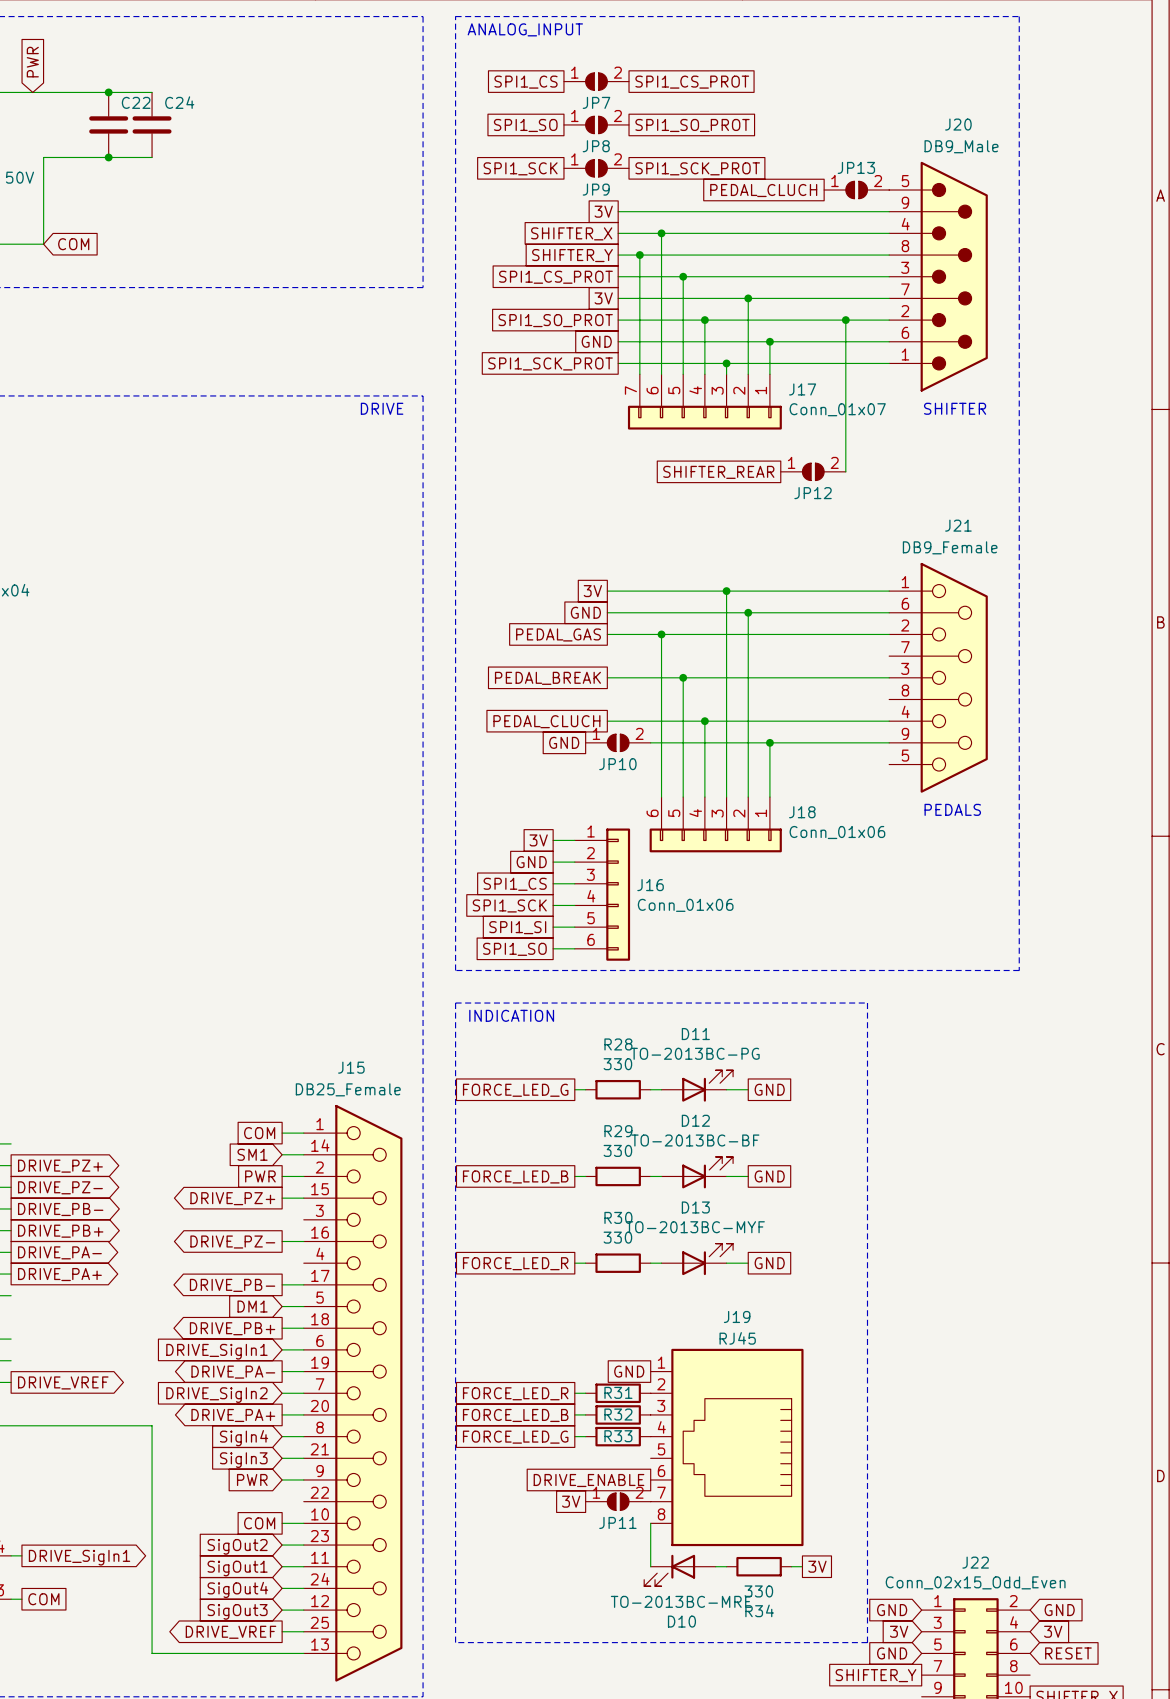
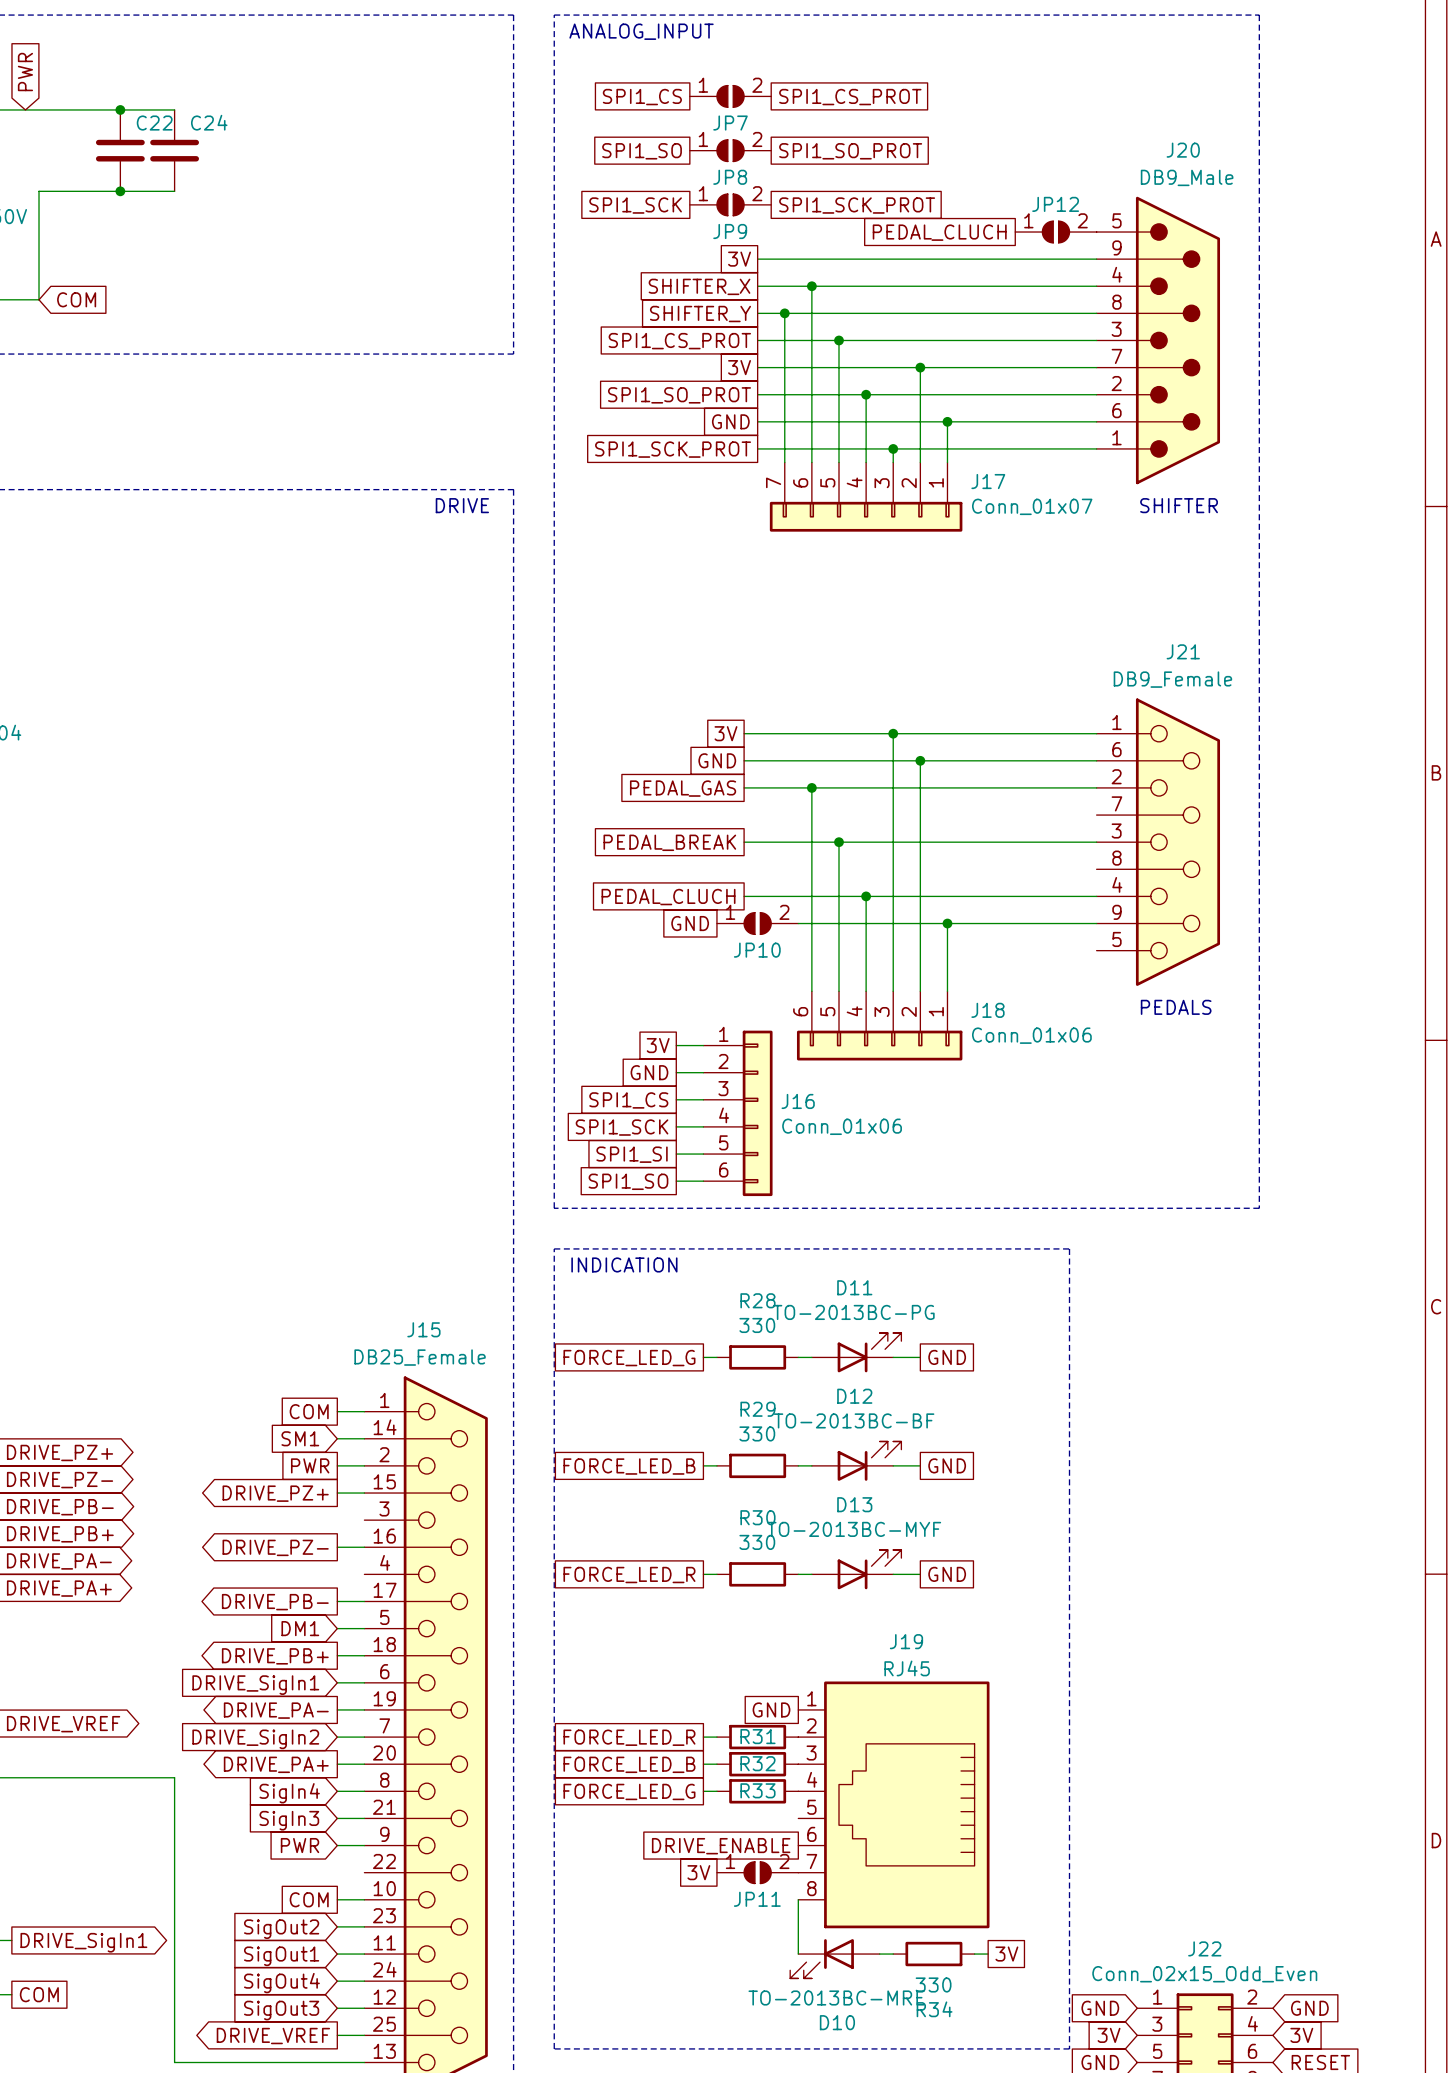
JP13 name: JP13 (856, 167) -> JP12 (1055, 204)
wire: (845, 320) (845, 471) -> none
junction: (845, 320) -> none
JP12: (813, 471) -> none
global label: SHIFTER_REAR (718, 472) -> none

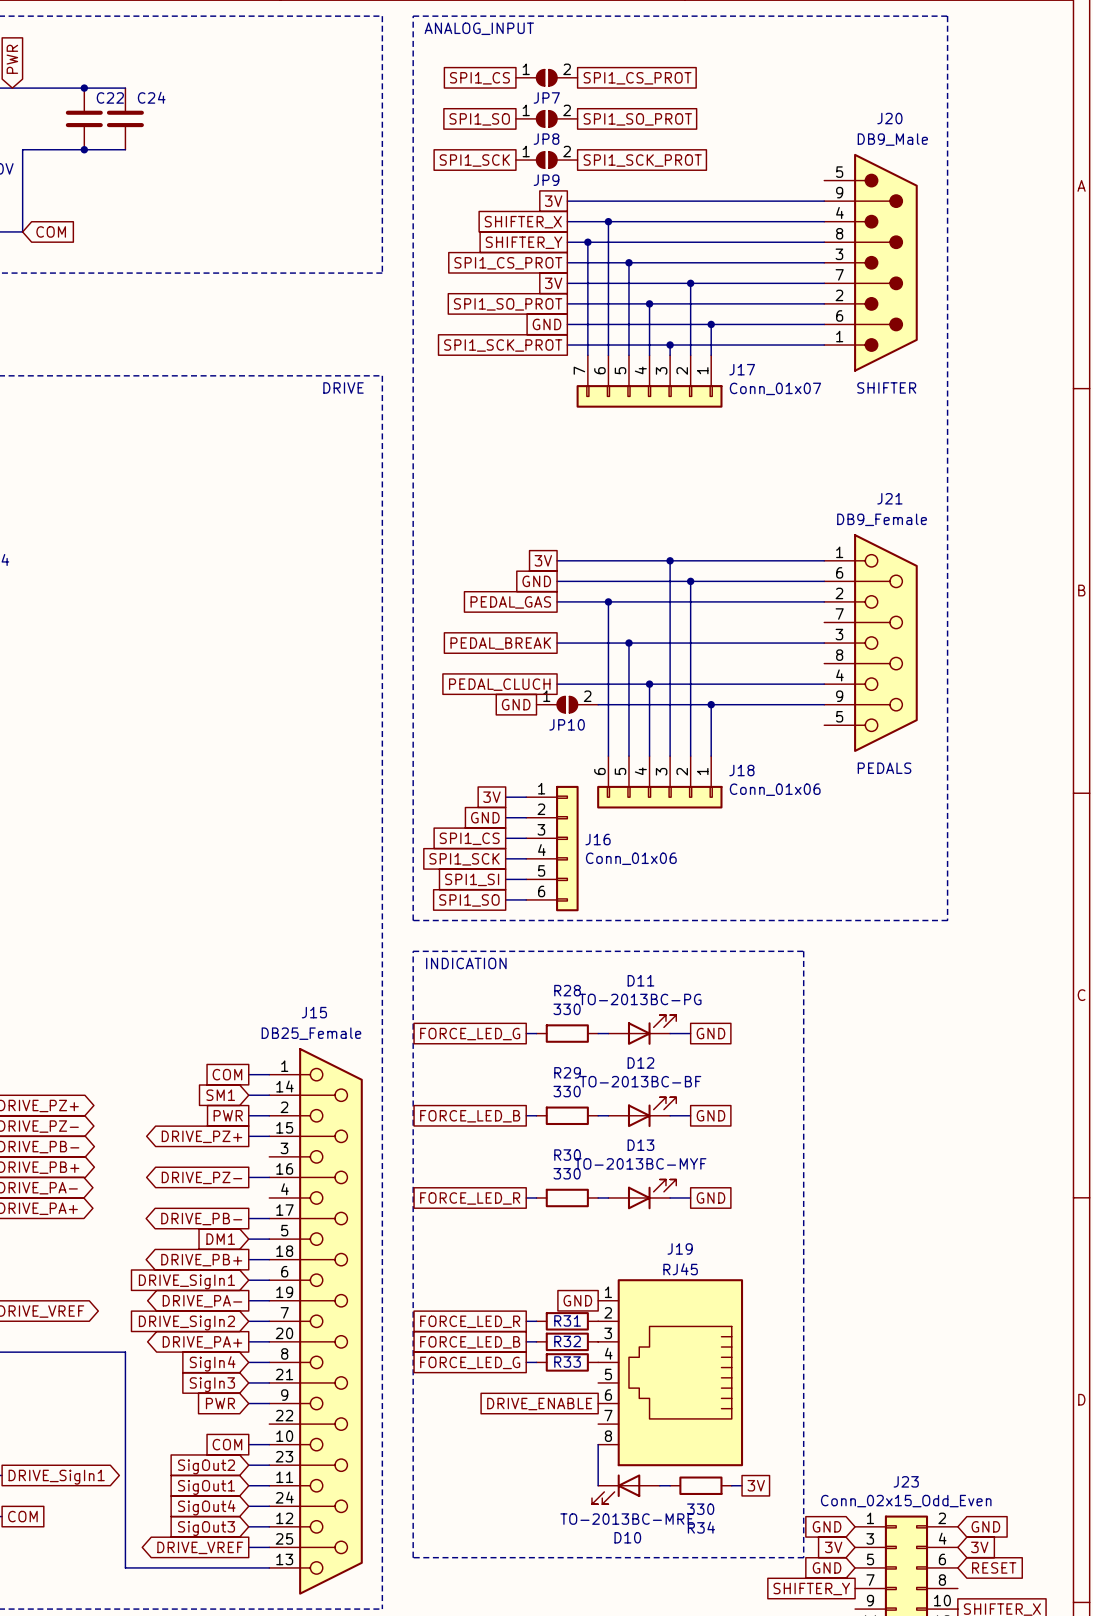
global label: PEDAL_CLUCH (939, 232) -> none
JP12: (1055, 232) -> none
global label: 3V (698, 1872) -> none
JP11: (757, 1872) -> none
J22 name: J22 (1204, 1948) -> J23 (906, 1481)

